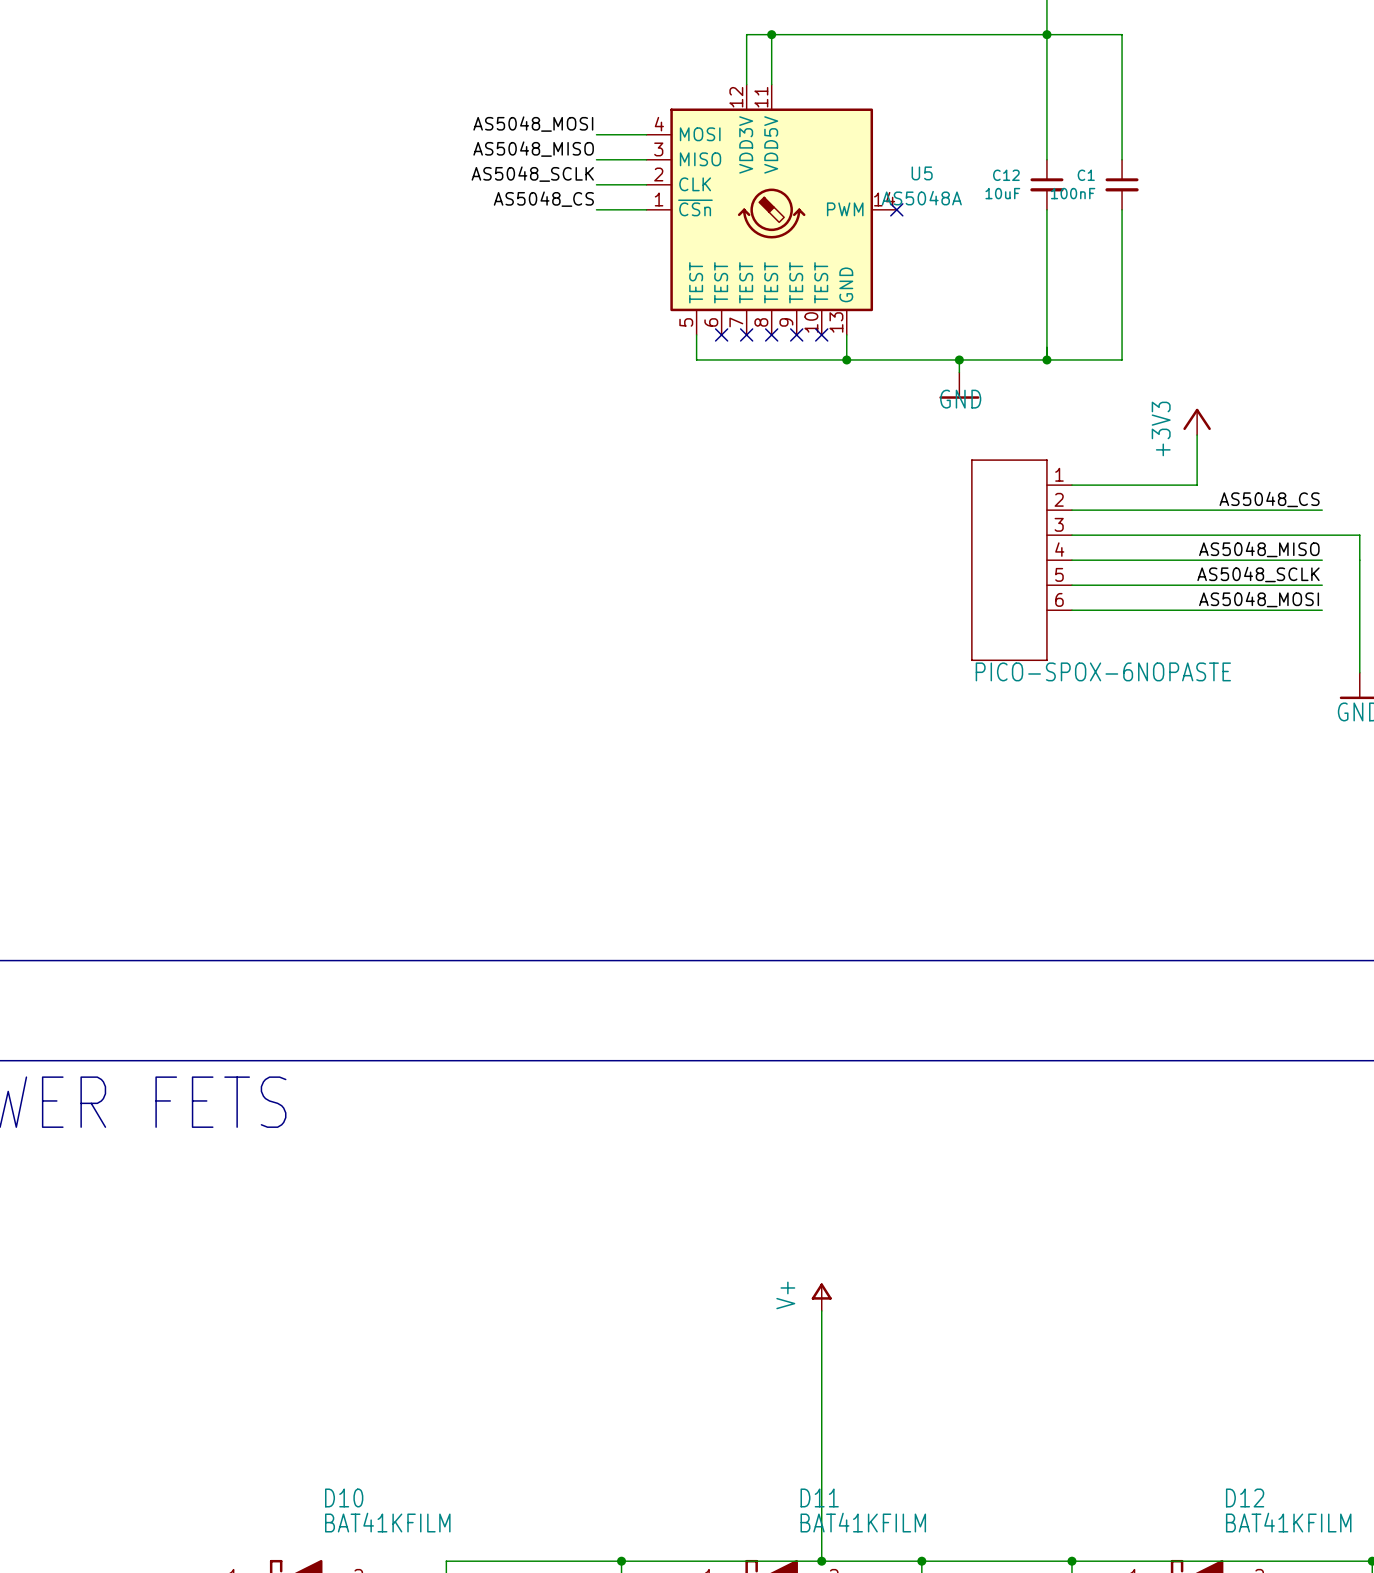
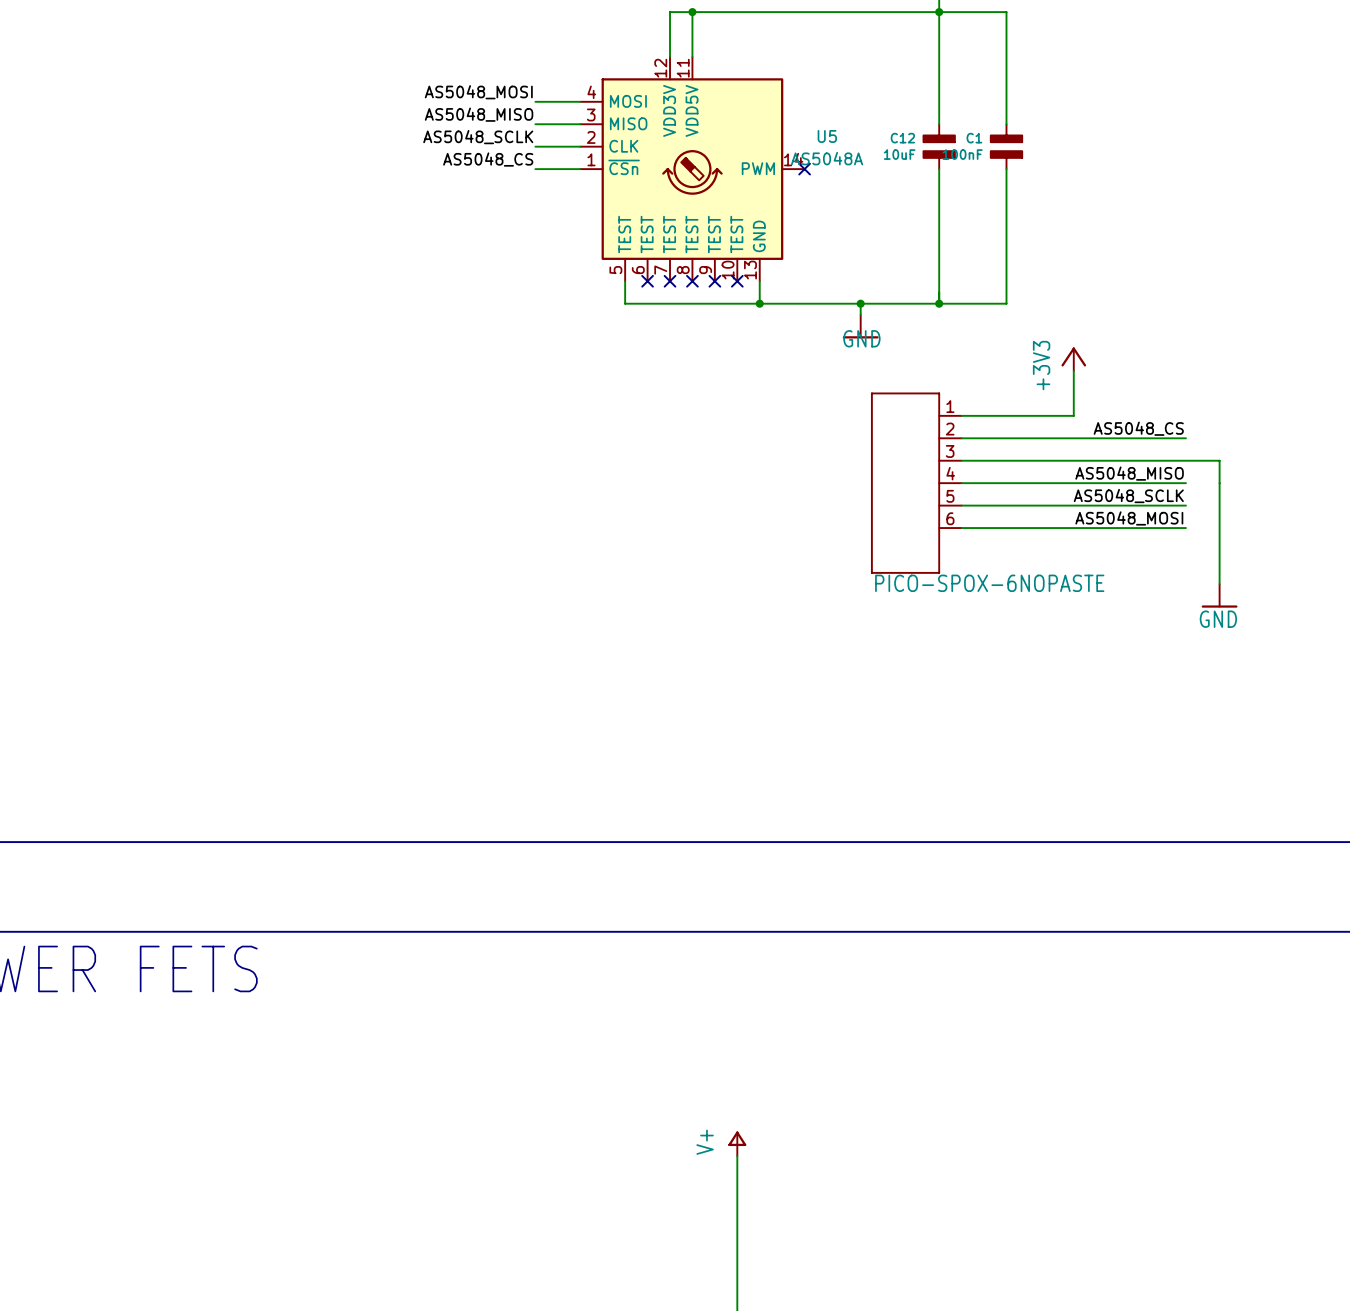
C12 symbol: [1030, 159, 1064, 210] -> [923, 123, 955, 170]
C1 symbol: [1105, 159, 1139, 210] -> [990, 123, 1023, 170]

